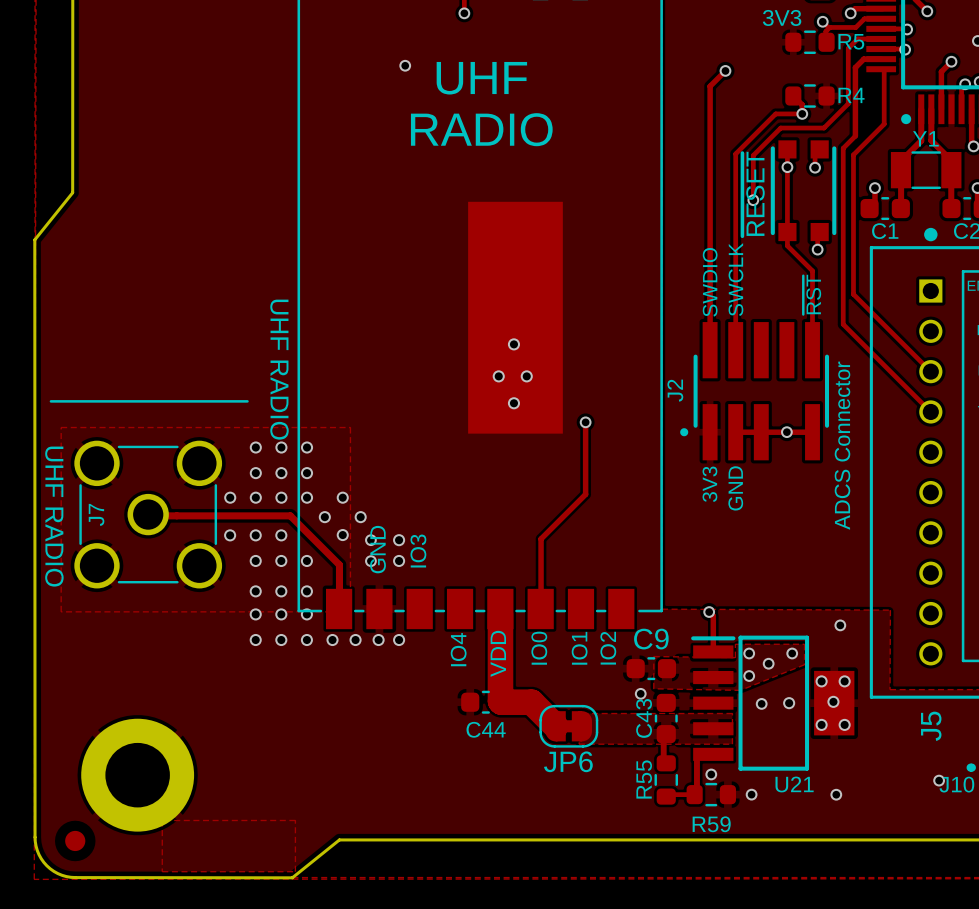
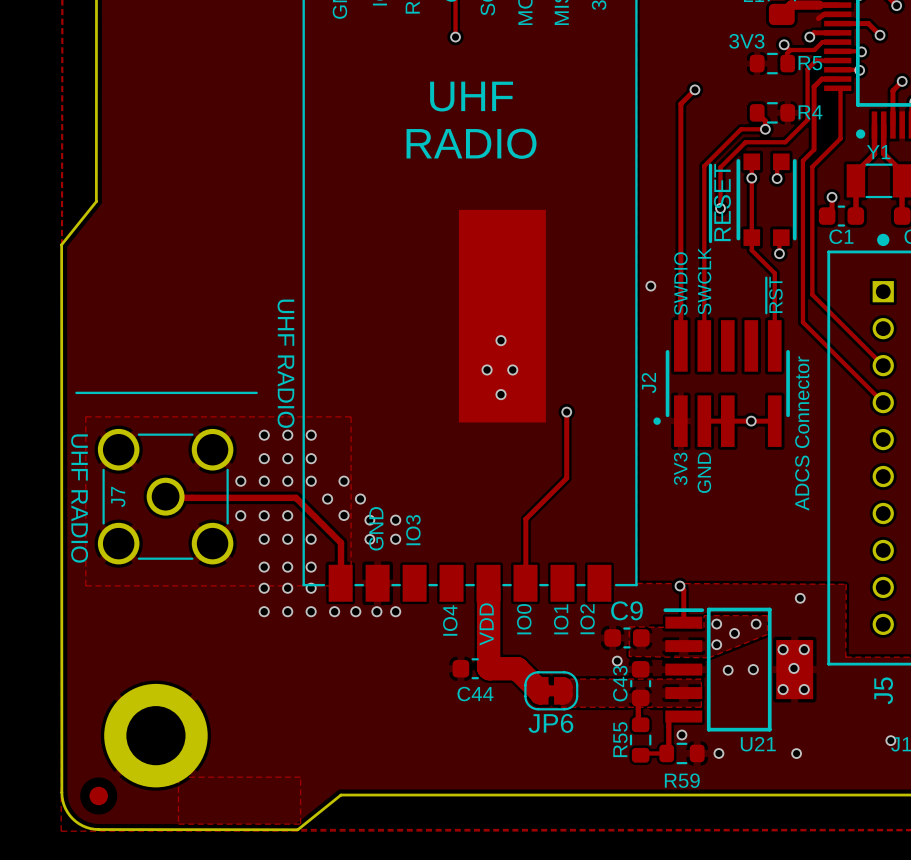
via: (405, 65) -> none
via: none -> (650, 286)

